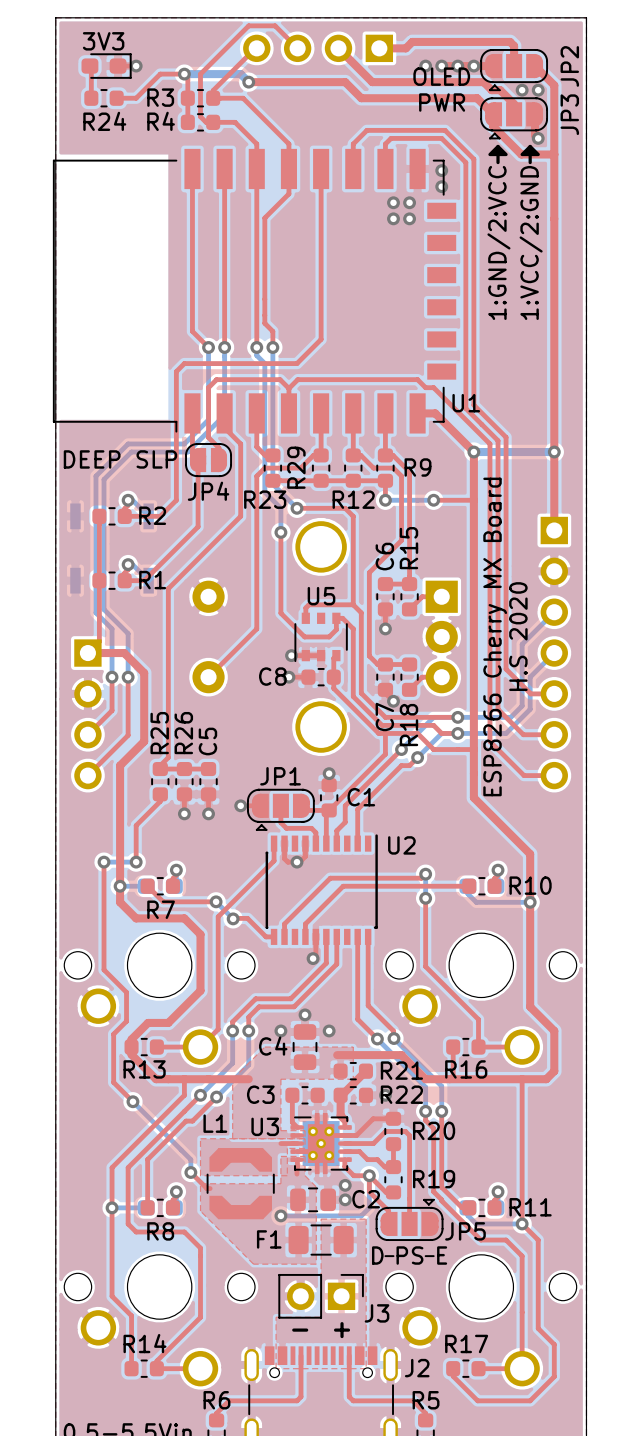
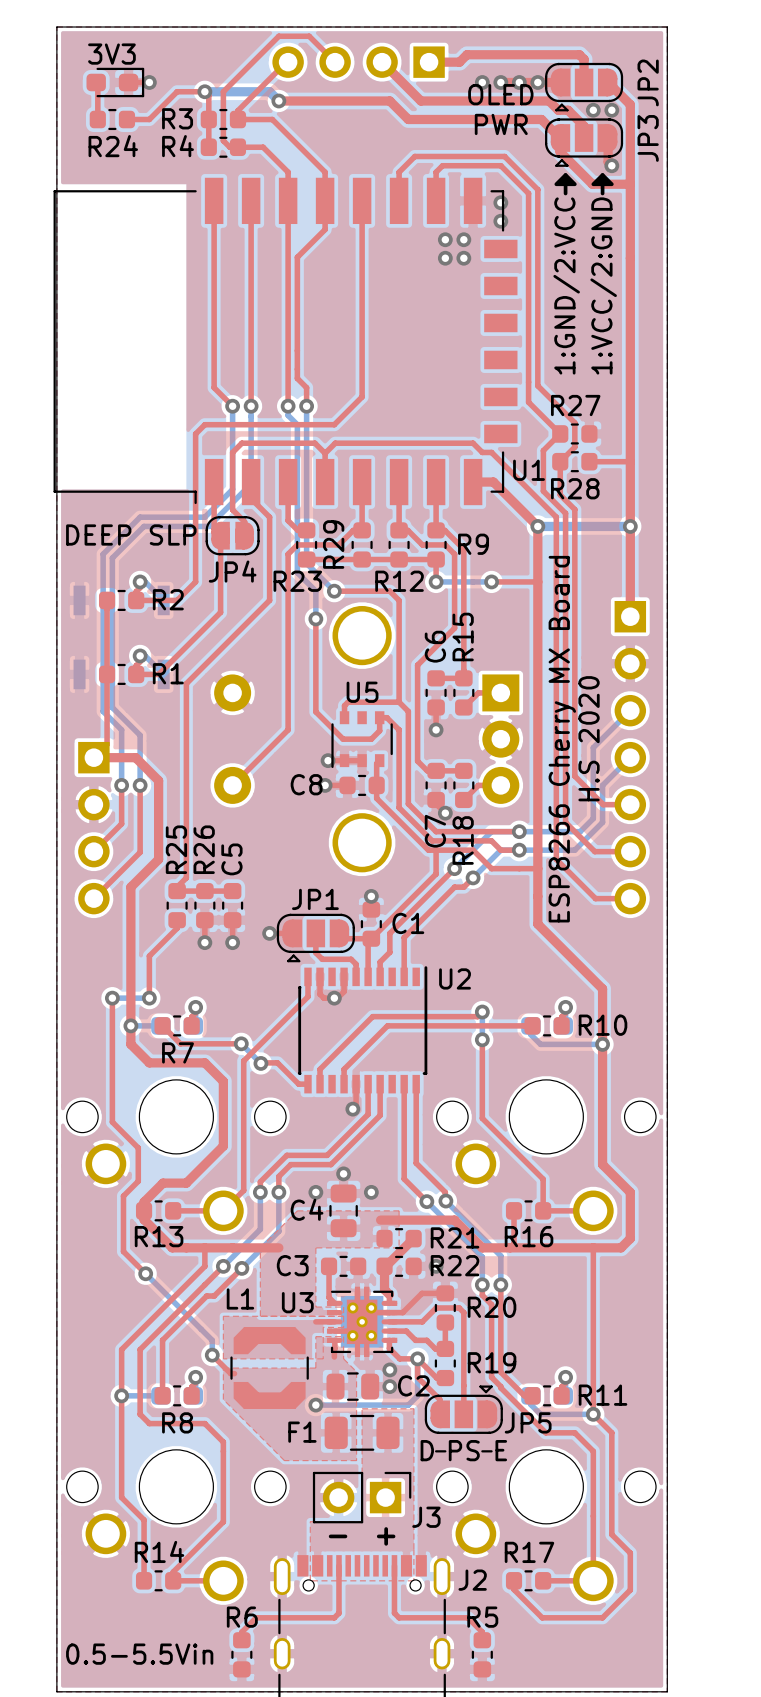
top track: (473, 329) (473, 405) (493, 424) -> (537, 385) (574, 422) (574, 447) (560, 461) (560, 494)
top track: (465, 344) (465, 408) (478, 421) -> (560, 433) (543, 450) (543, 491)
top track: none -> (528, 402) (560, 433)
R27: none -> (574, 433)
R28: none -> (574, 461)
top track: none -> (589, 461) (630, 461)

